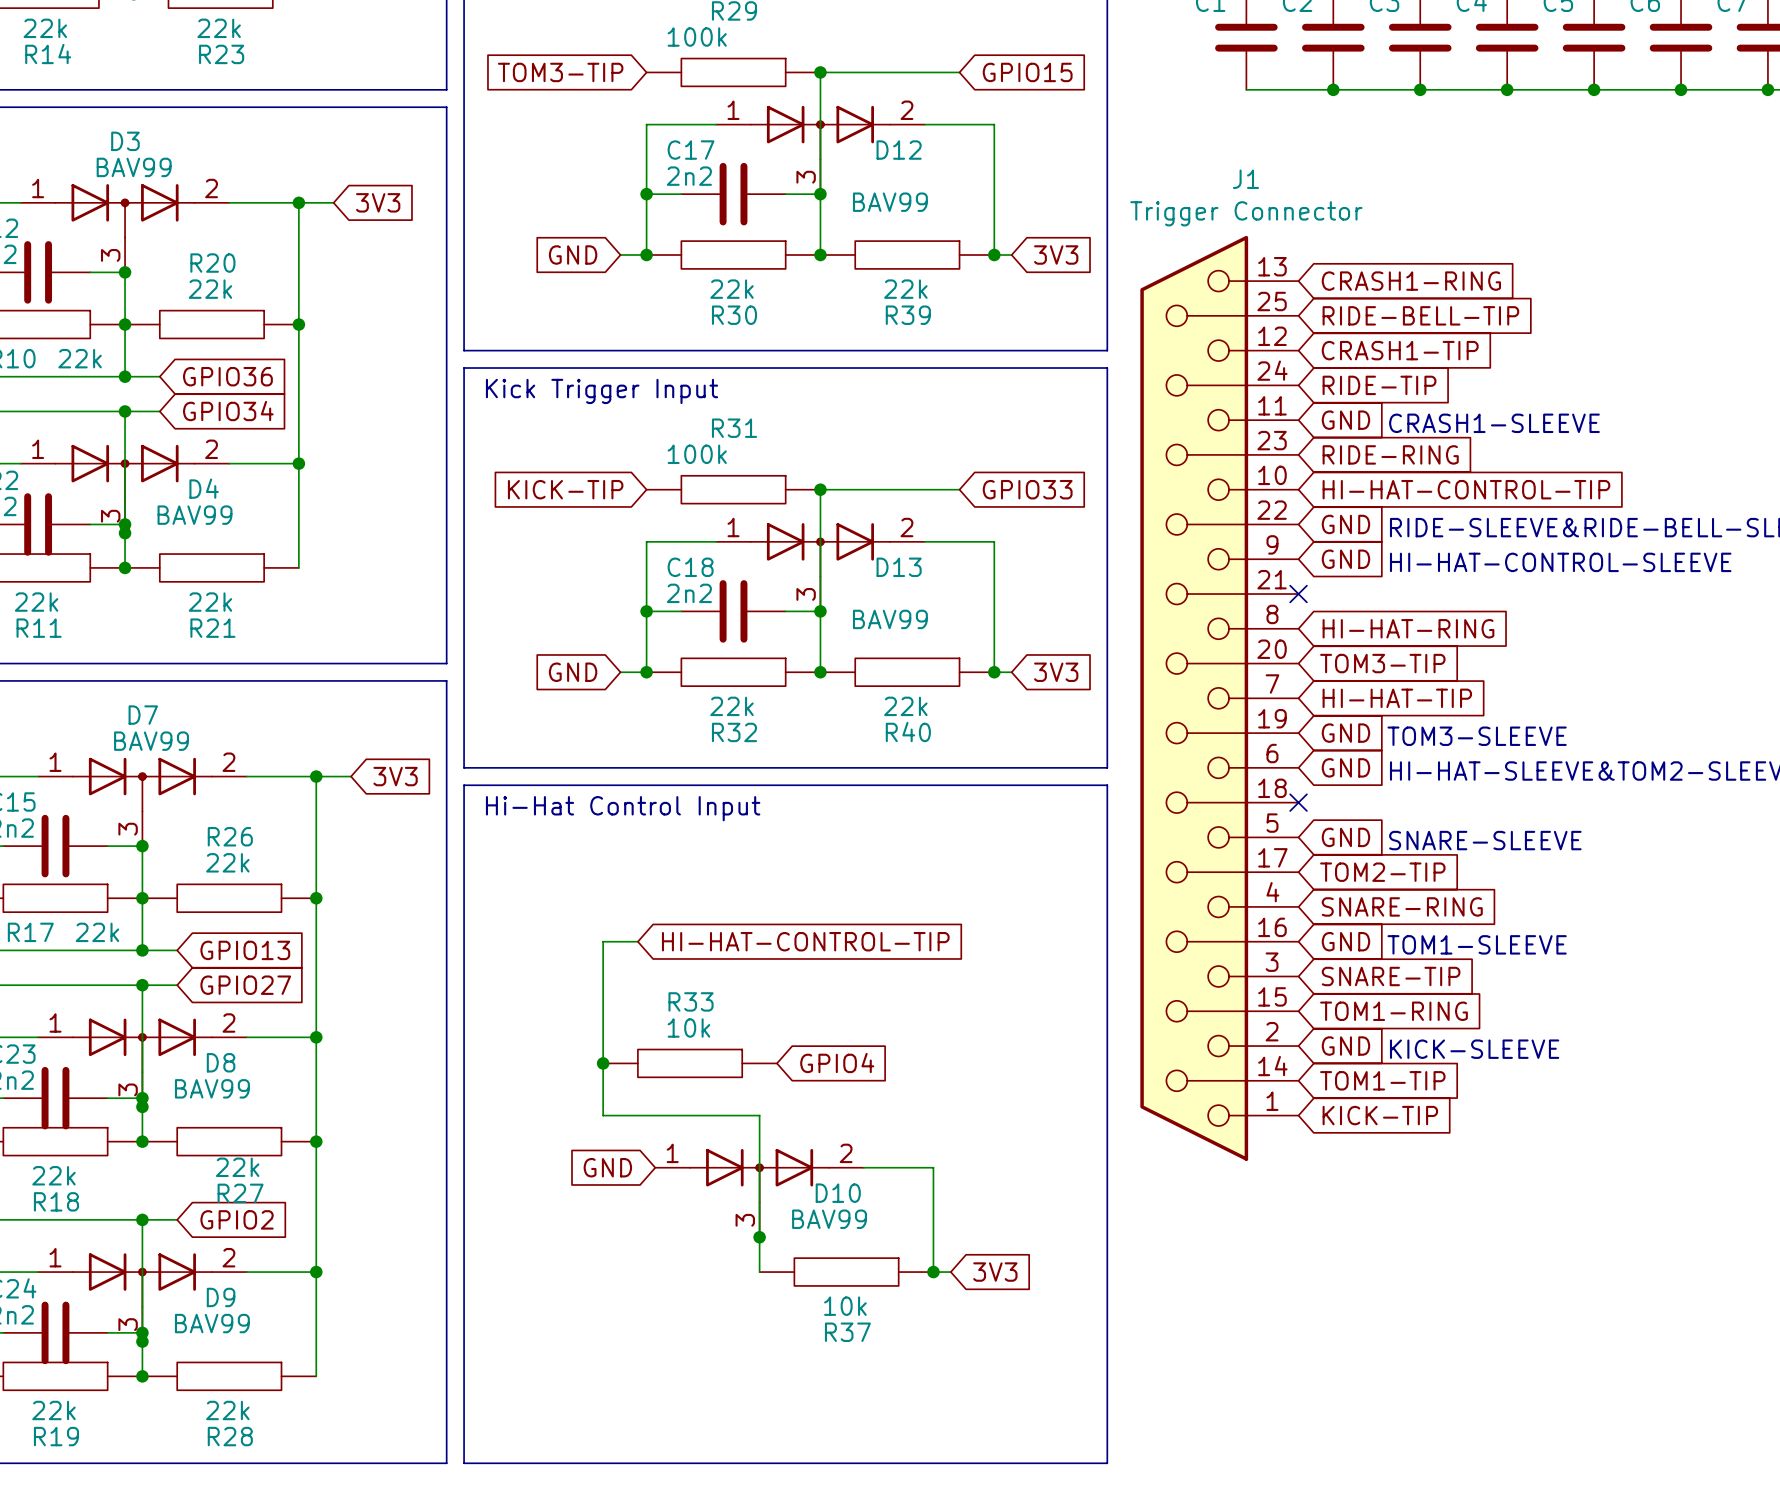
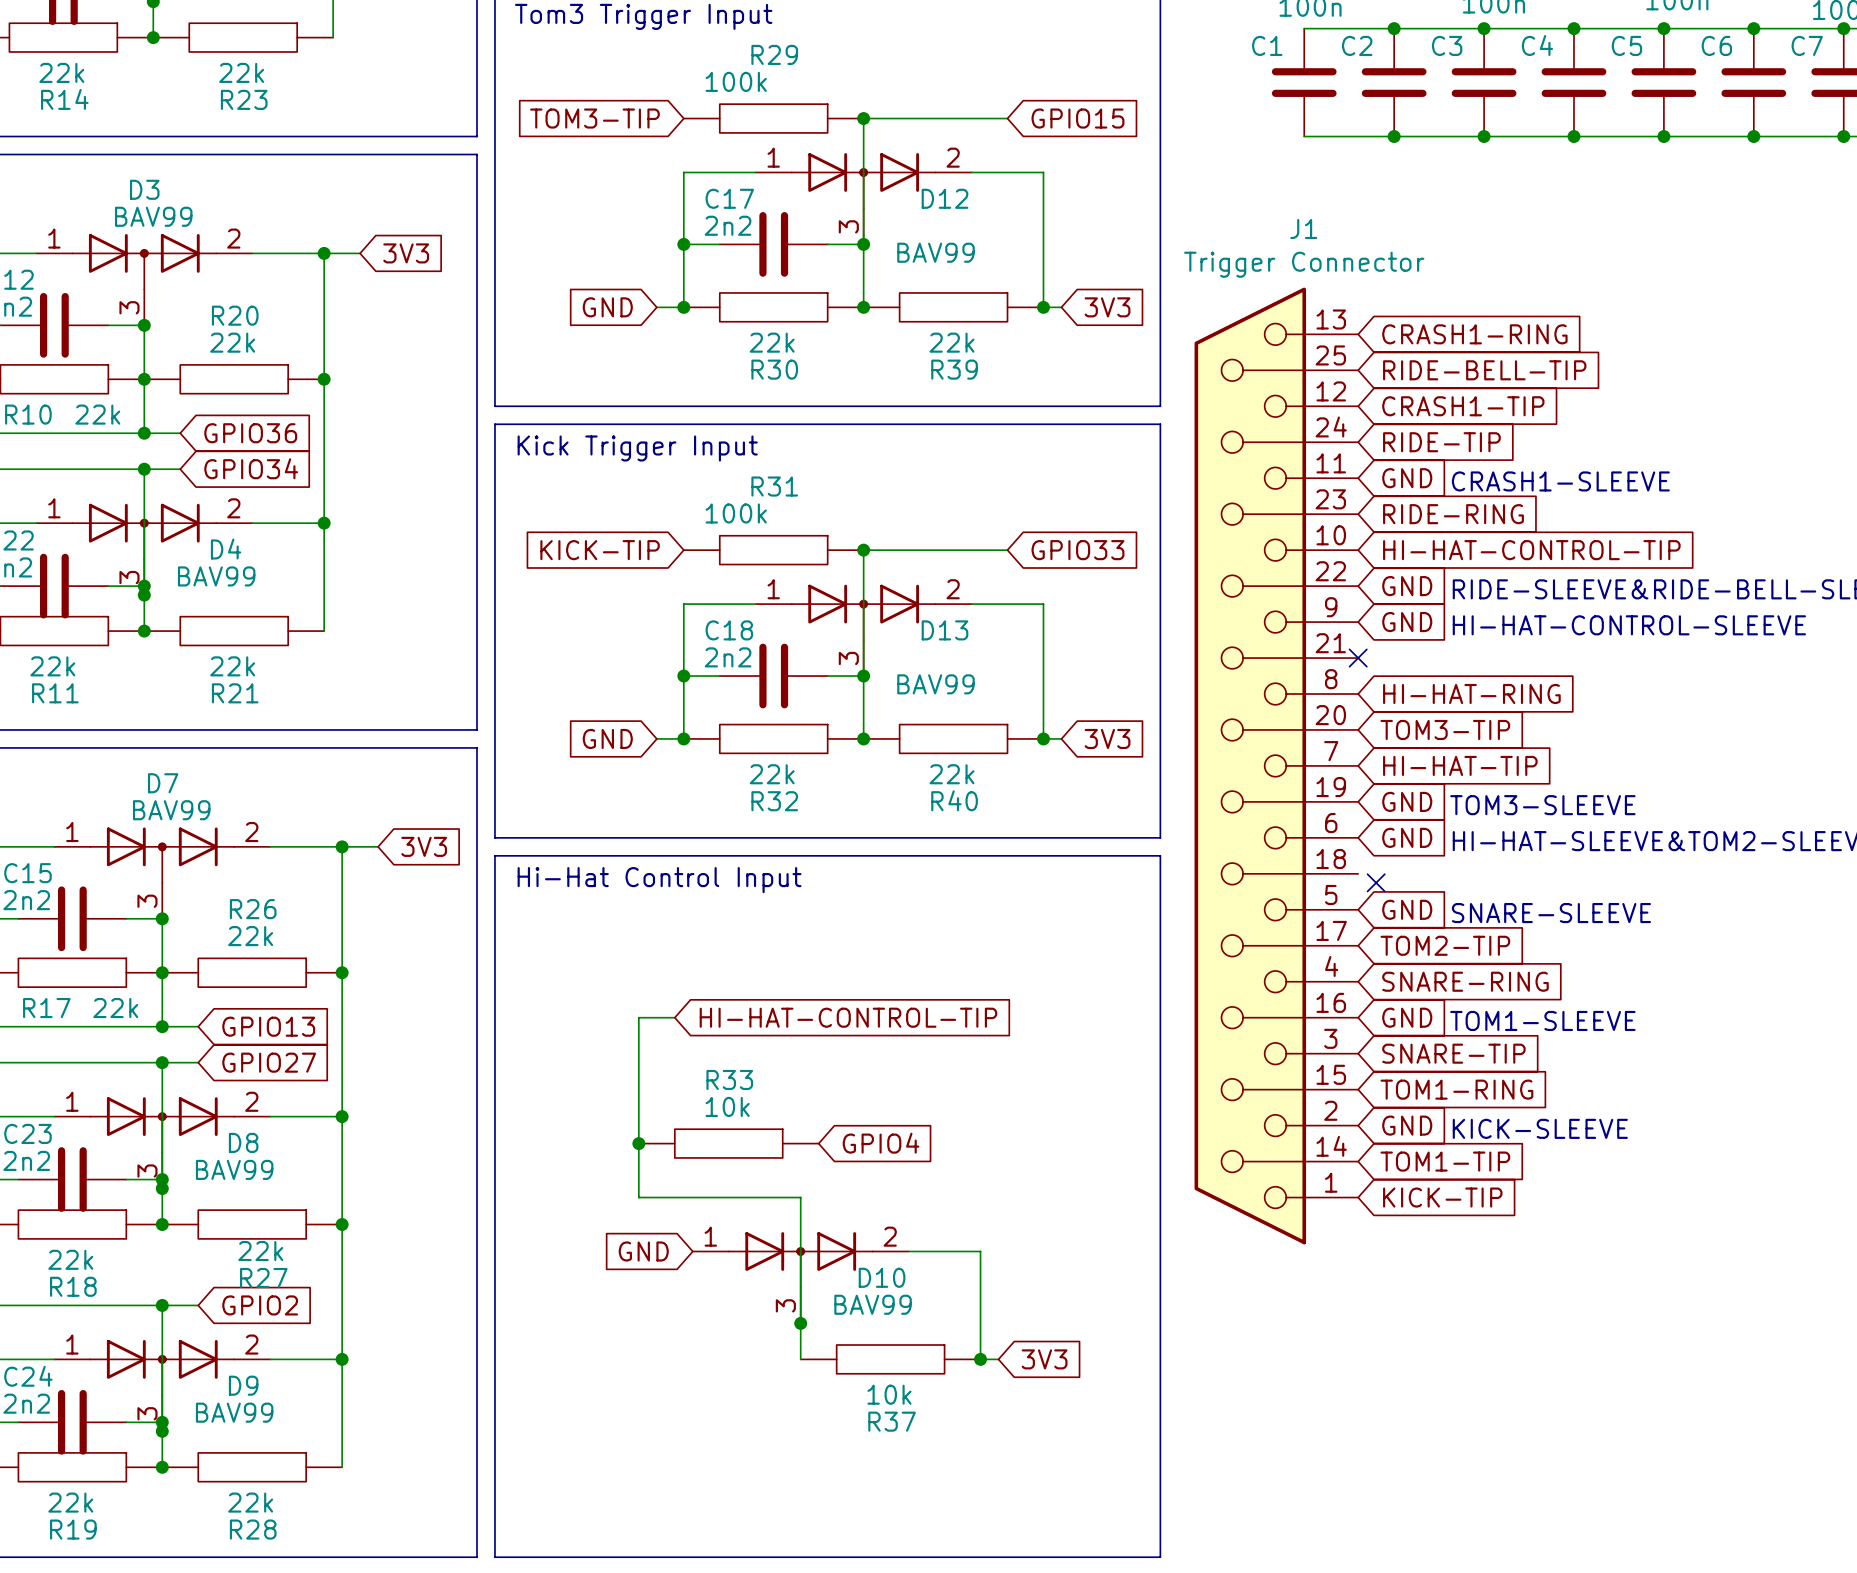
no-connect mark position: (1298, 802) -> (1376, 882)

